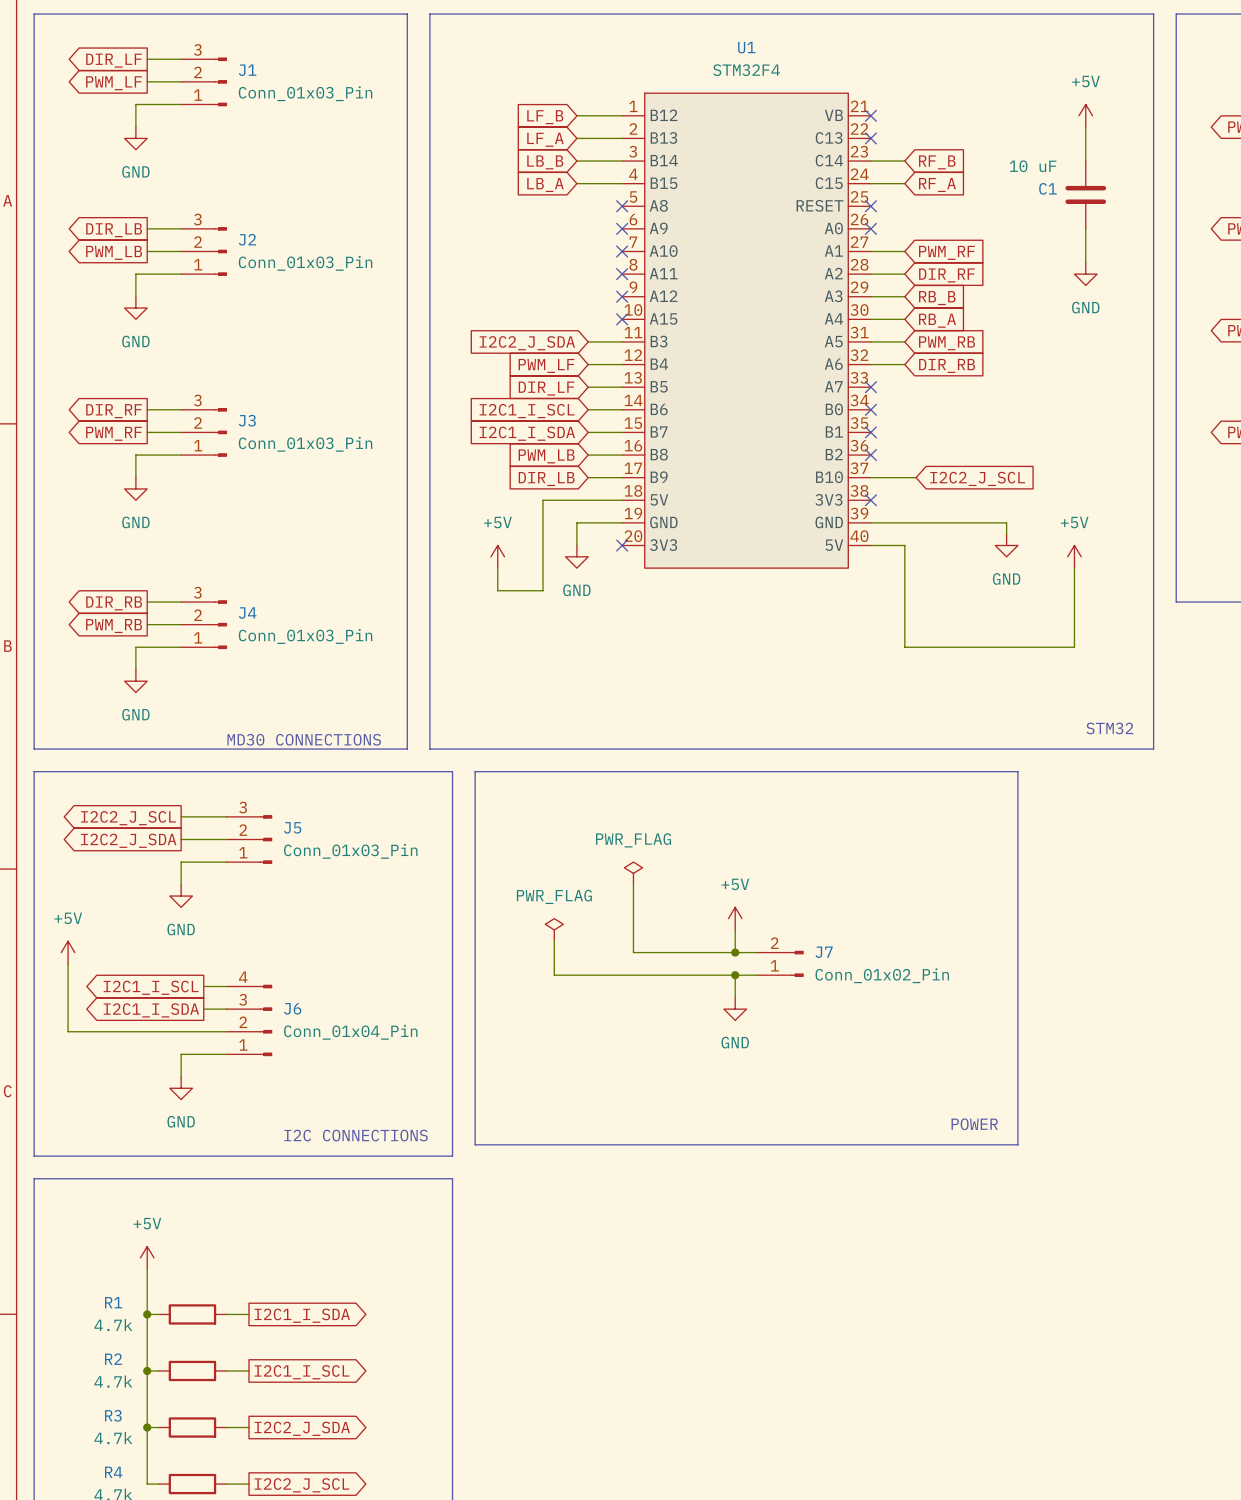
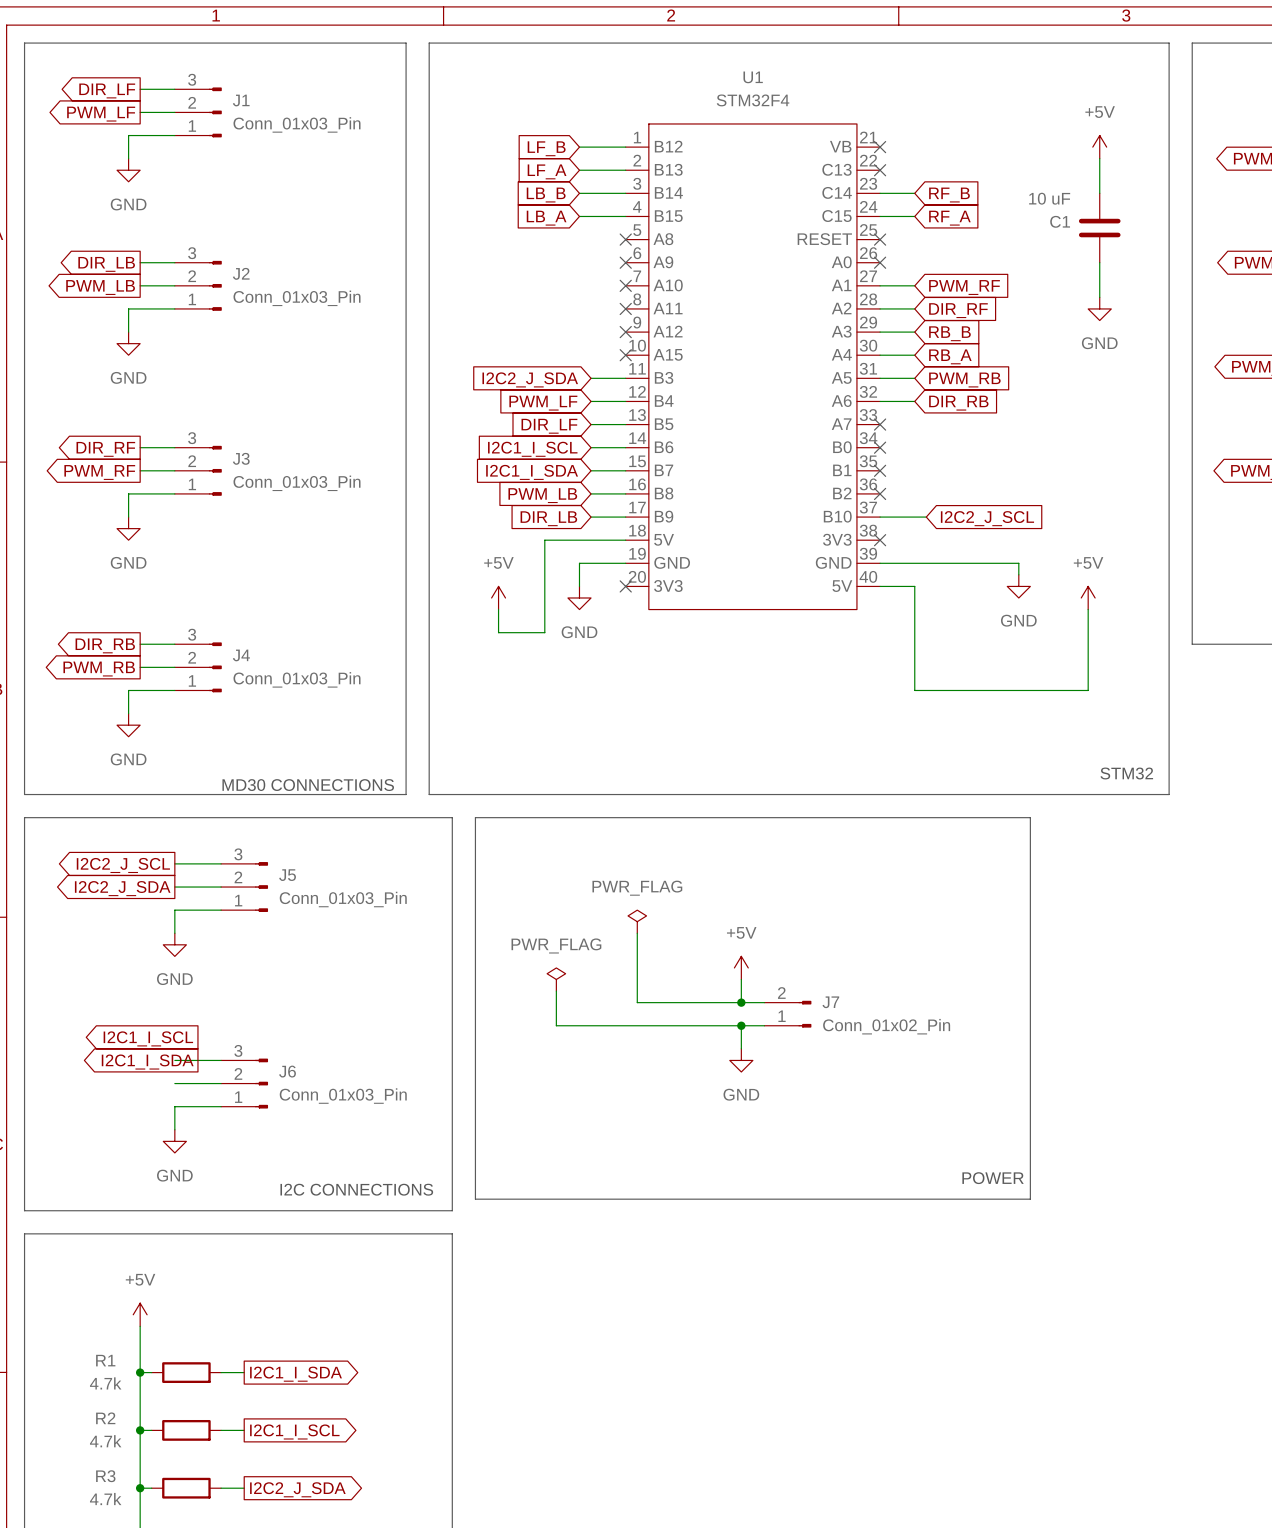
power symbol: +5V (68, 952) -> none
wire: (68, 963) (68, 1031) (181, 1031) -> none
J6 symbol: [226, 984, 273, 1057] -> [221, 1058, 269, 1109]
wire: (203, 986) (226, 986) -> (174, 1060) (197, 1060)
J6 value: Conn_01x04_Pin (350, 1032) -> Conn_01x03_Pin (343, 1096)

